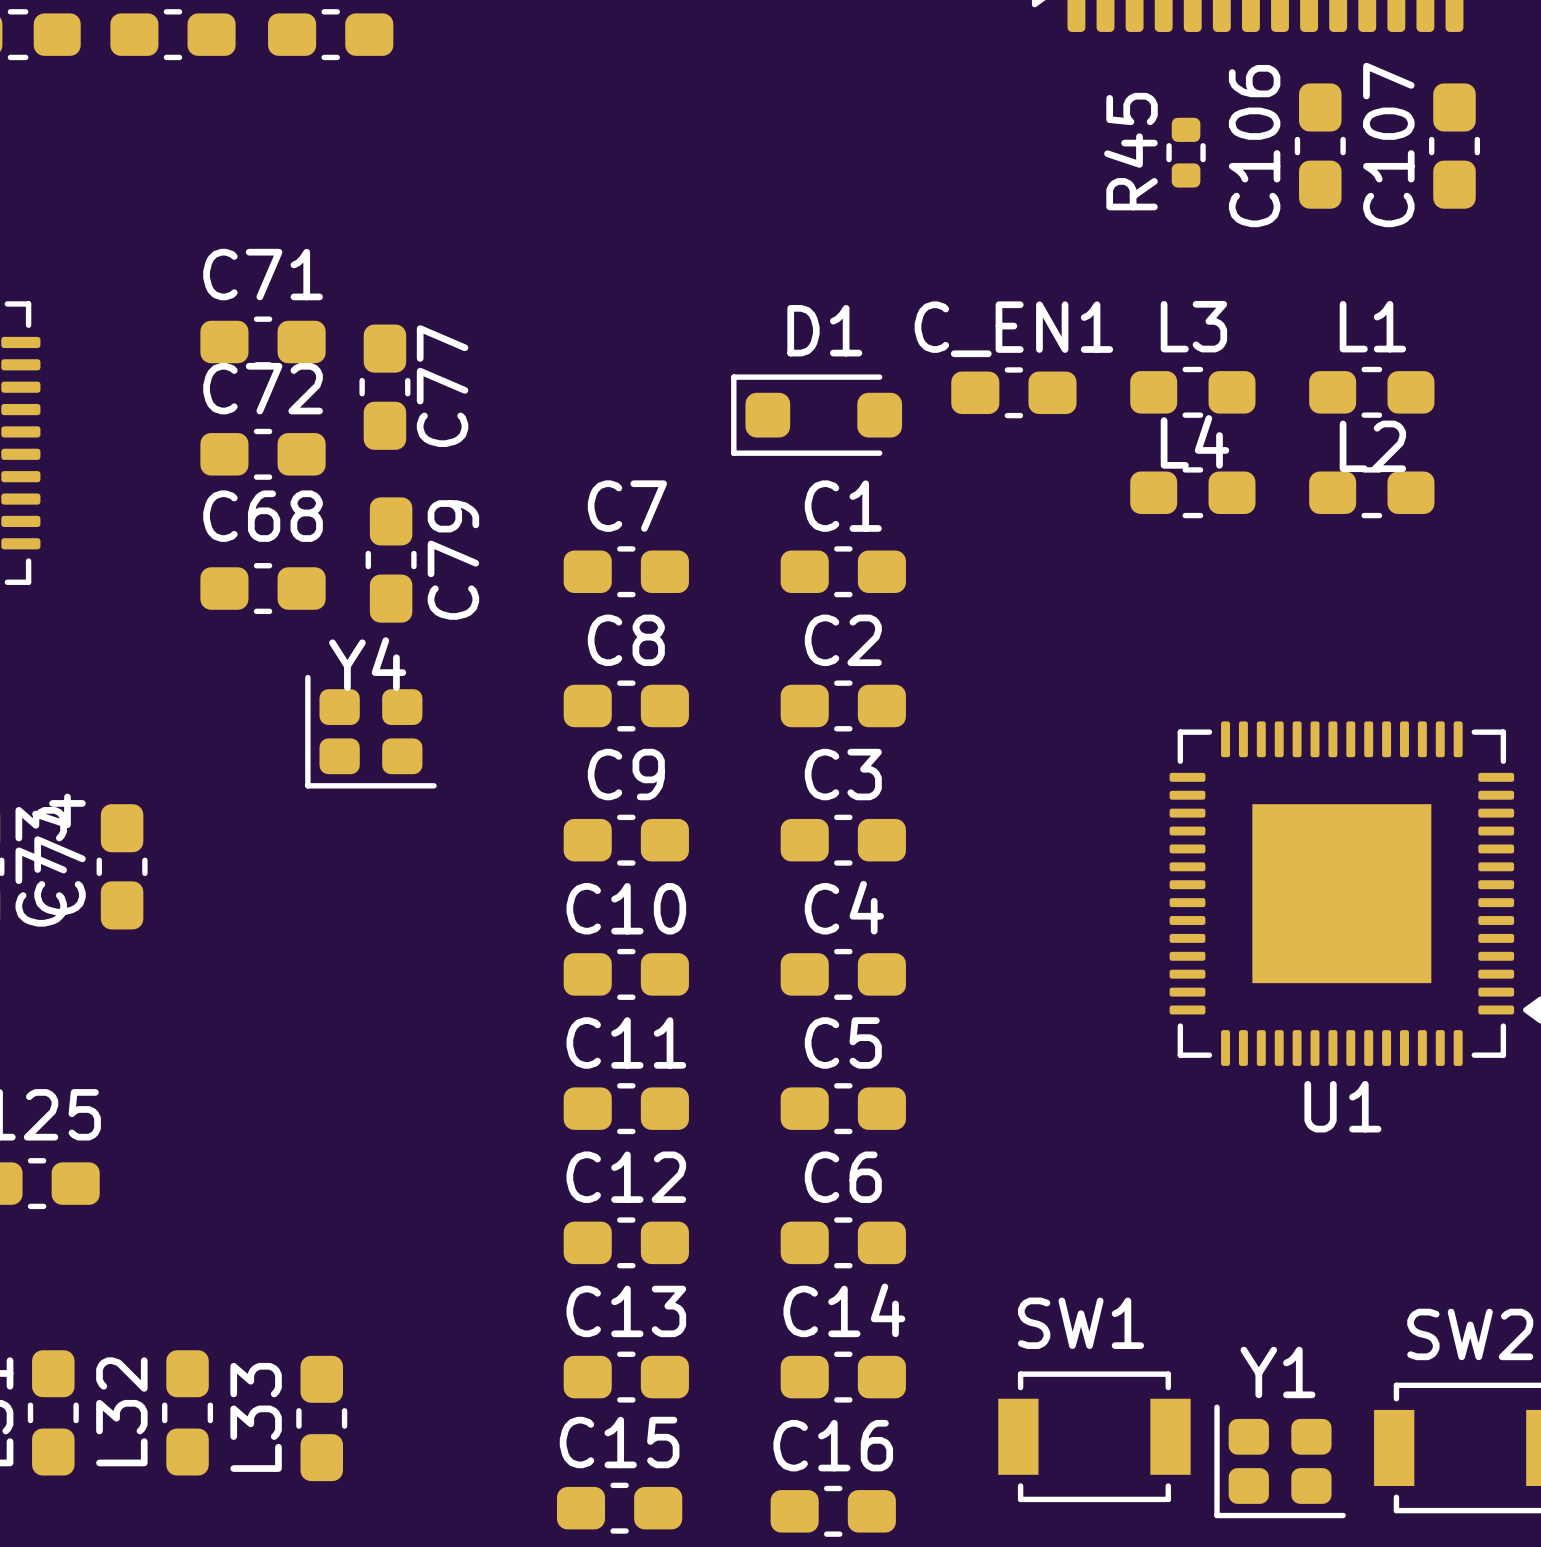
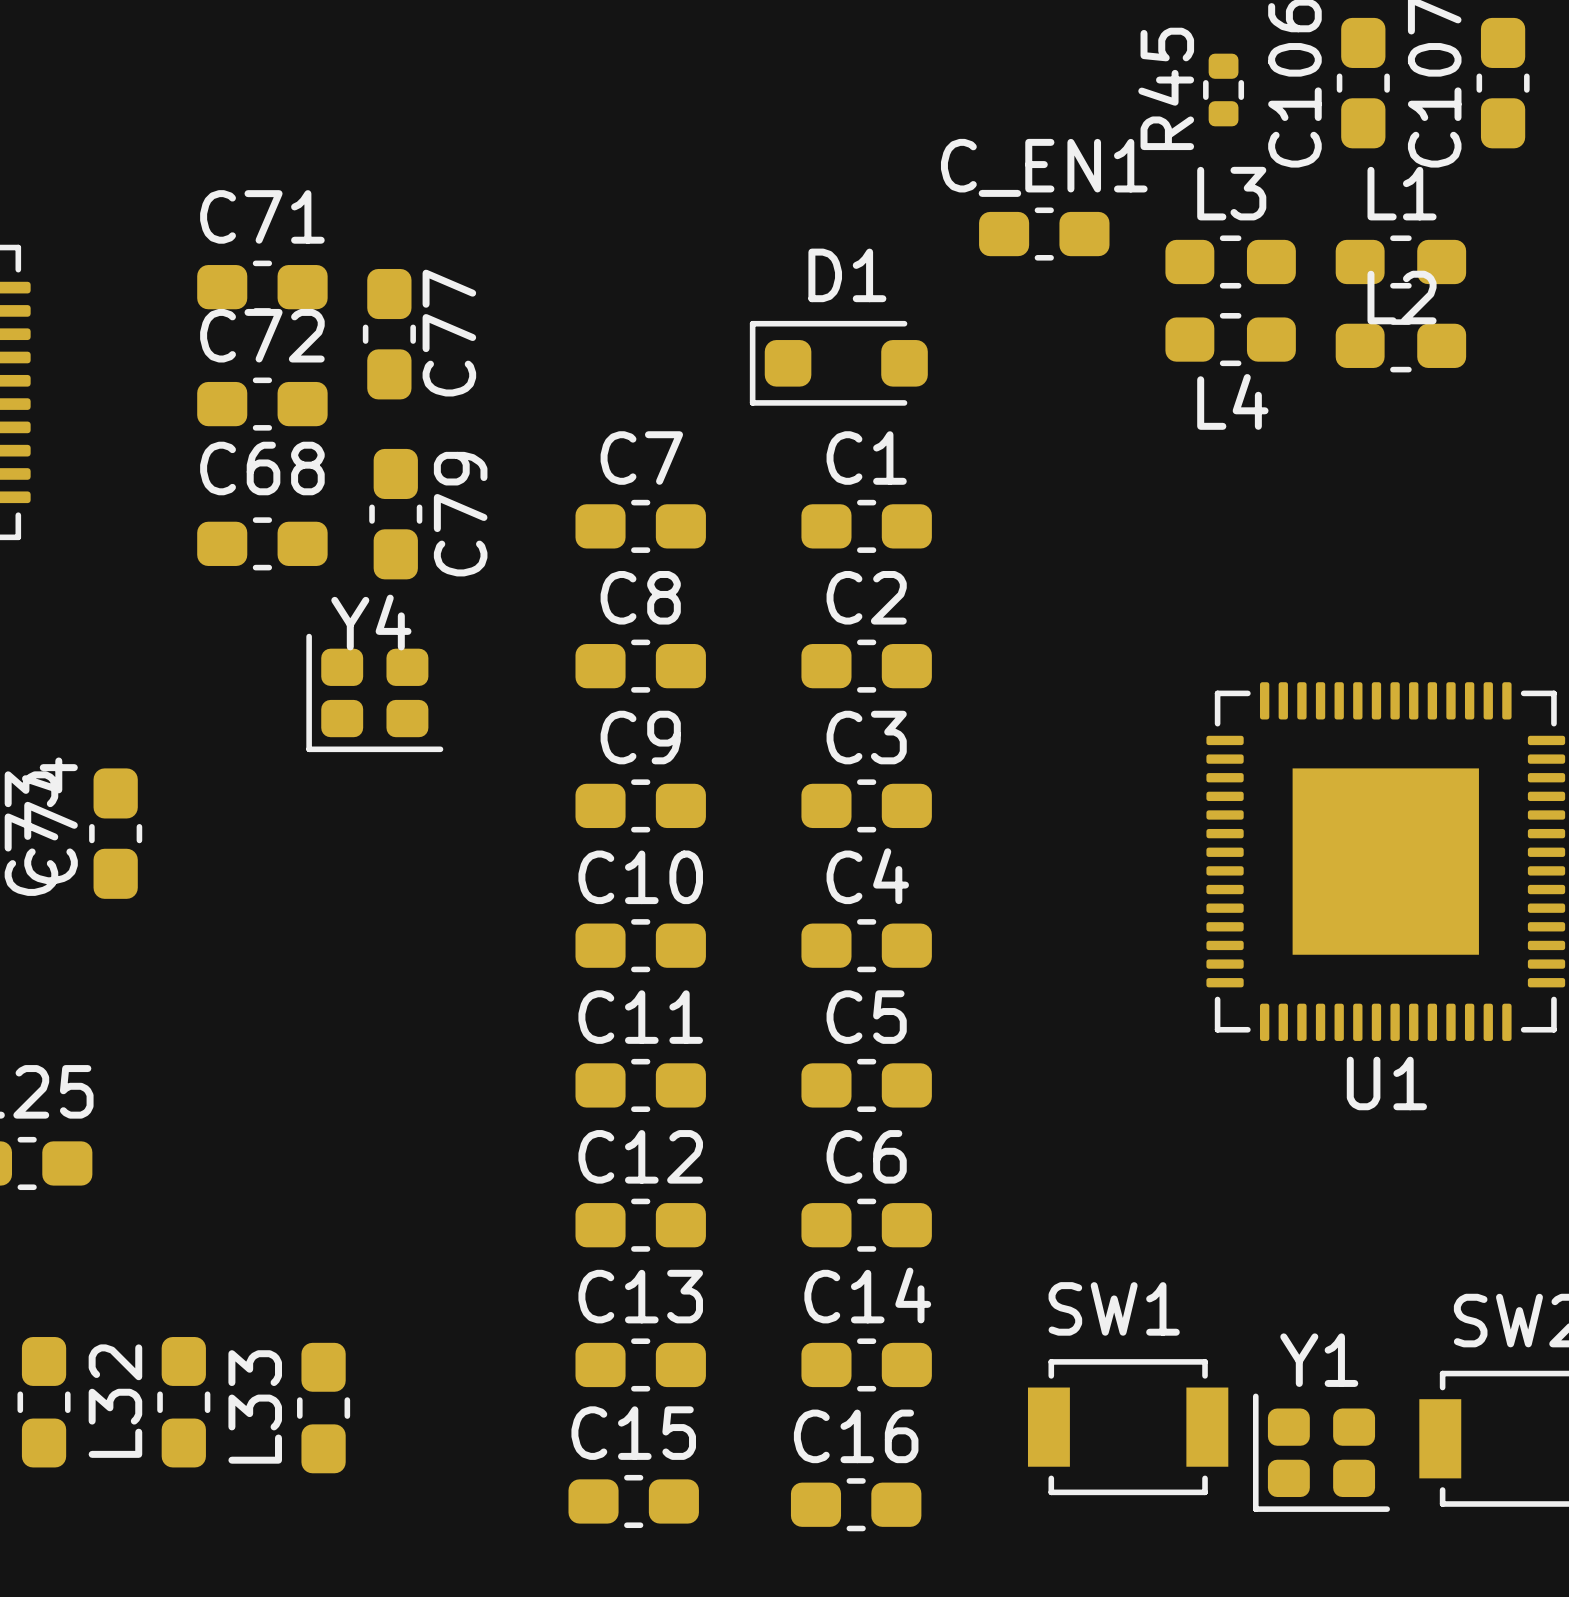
L3: none -> (1230, 261)
L3 name: L3 (1193, 326) -> L4 (1232, 401)
C_EN1 position: (1013, 392) -> (1044, 234)
L1 position: (1371, 392) -> (1400, 261)
L4: (1192, 492) -> none
L2 position: (1371, 492) -> (1400, 345)

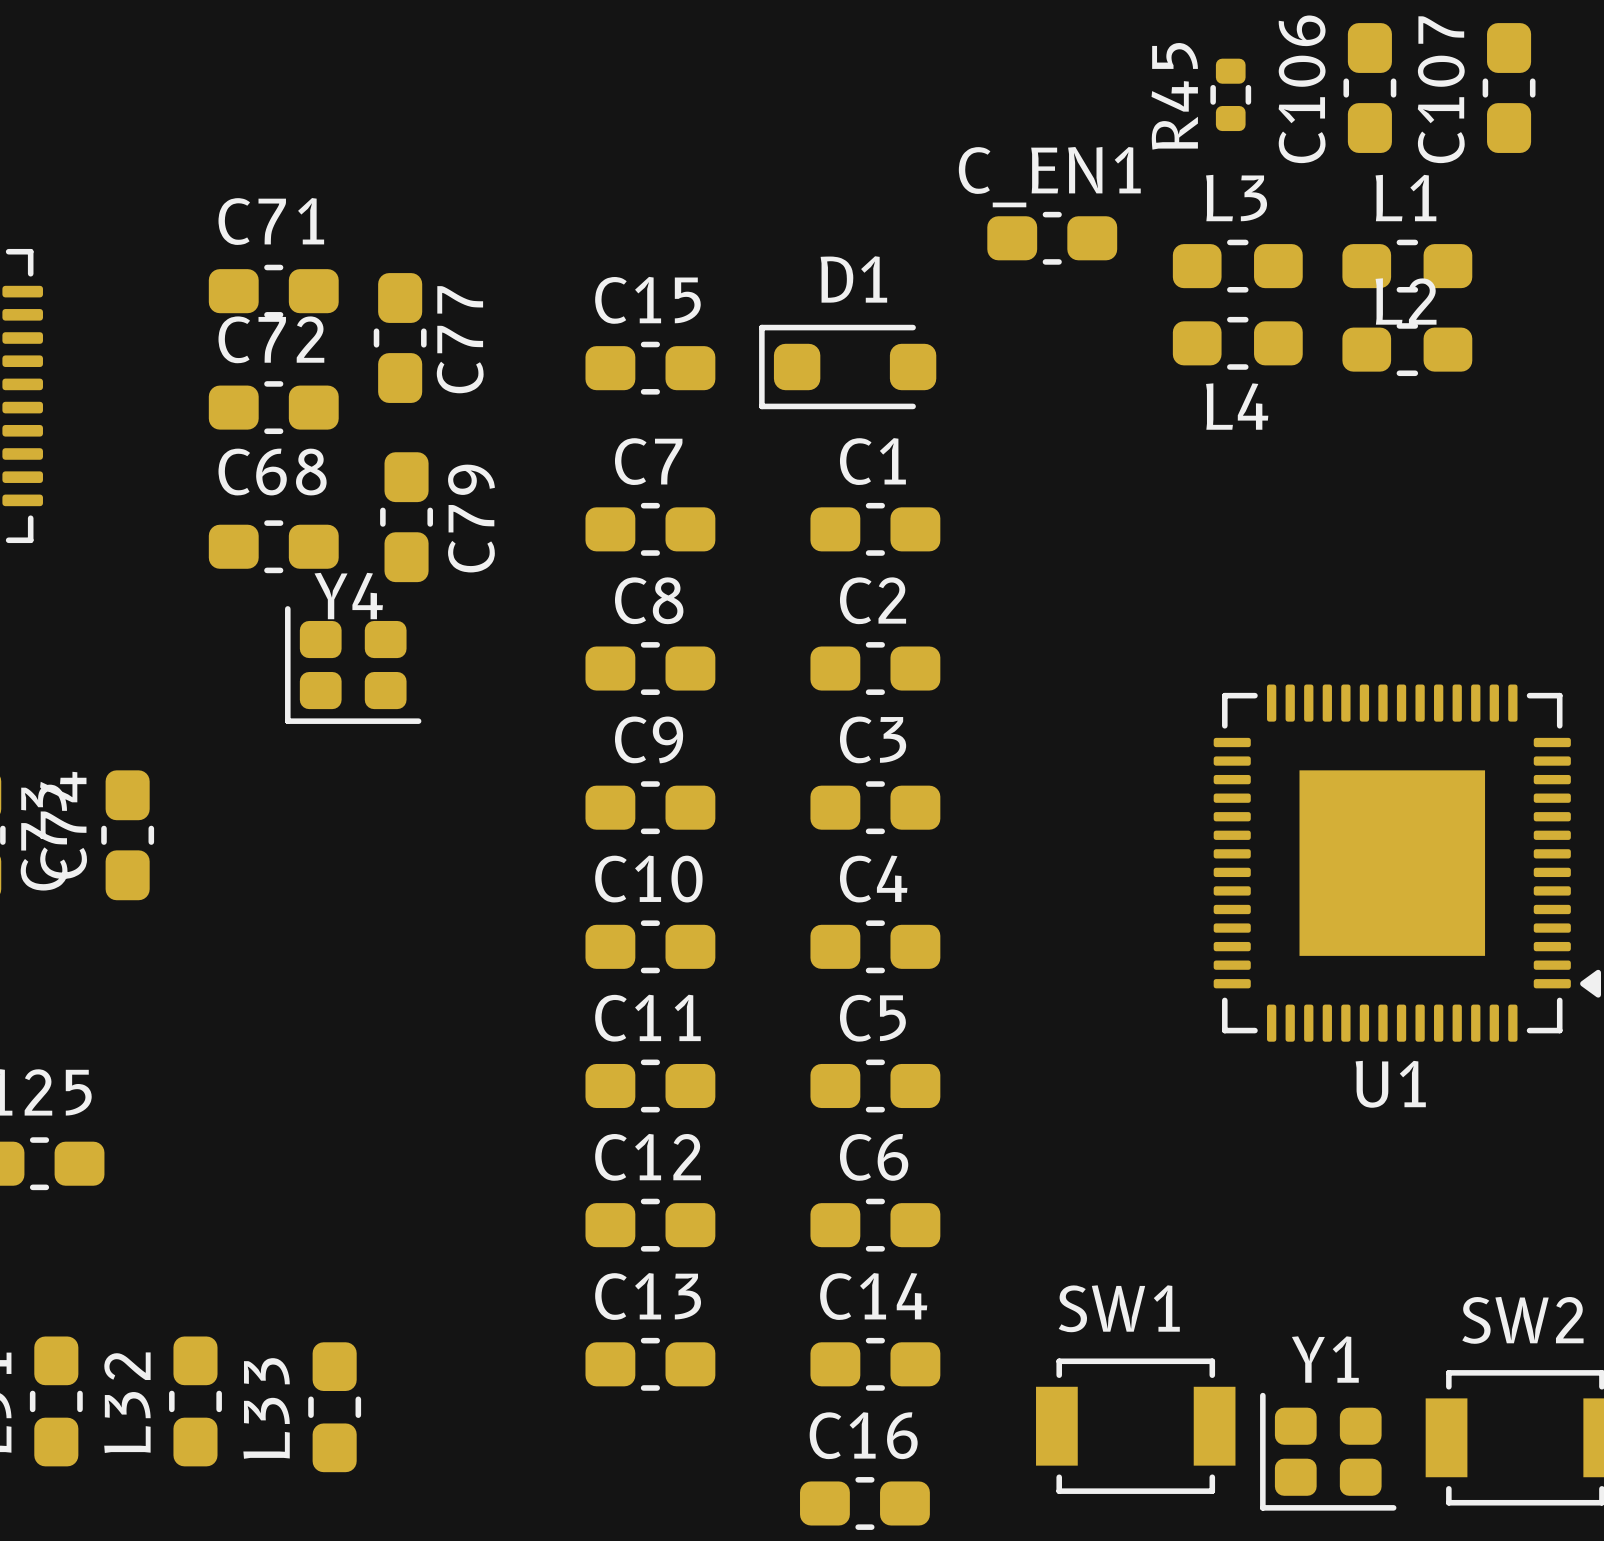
Y4 position: (374, 692) -> (353, 665)
C15 position: (633, 1501) -> (650, 368)

